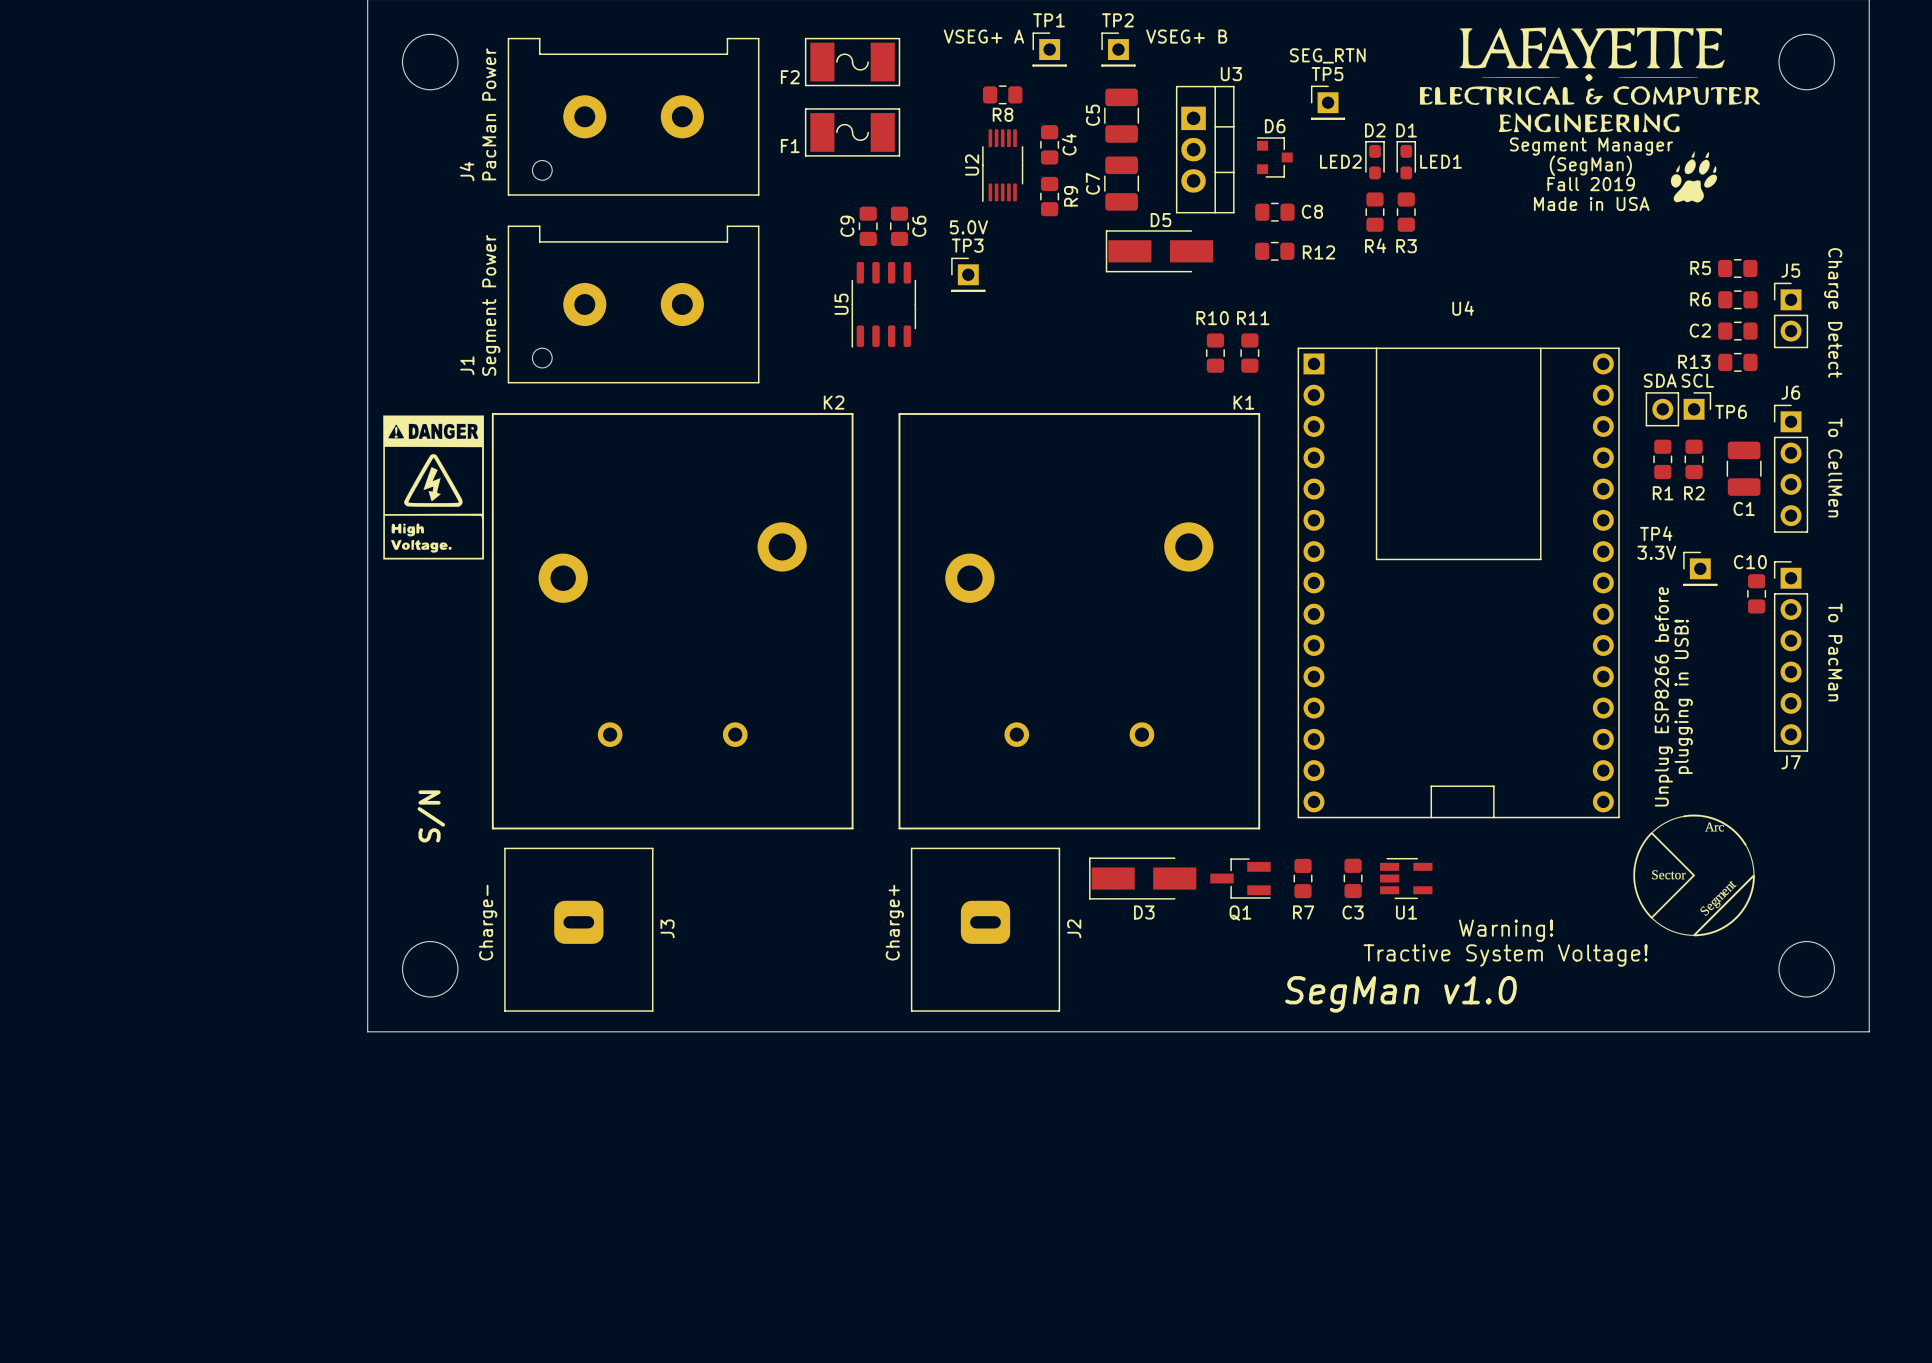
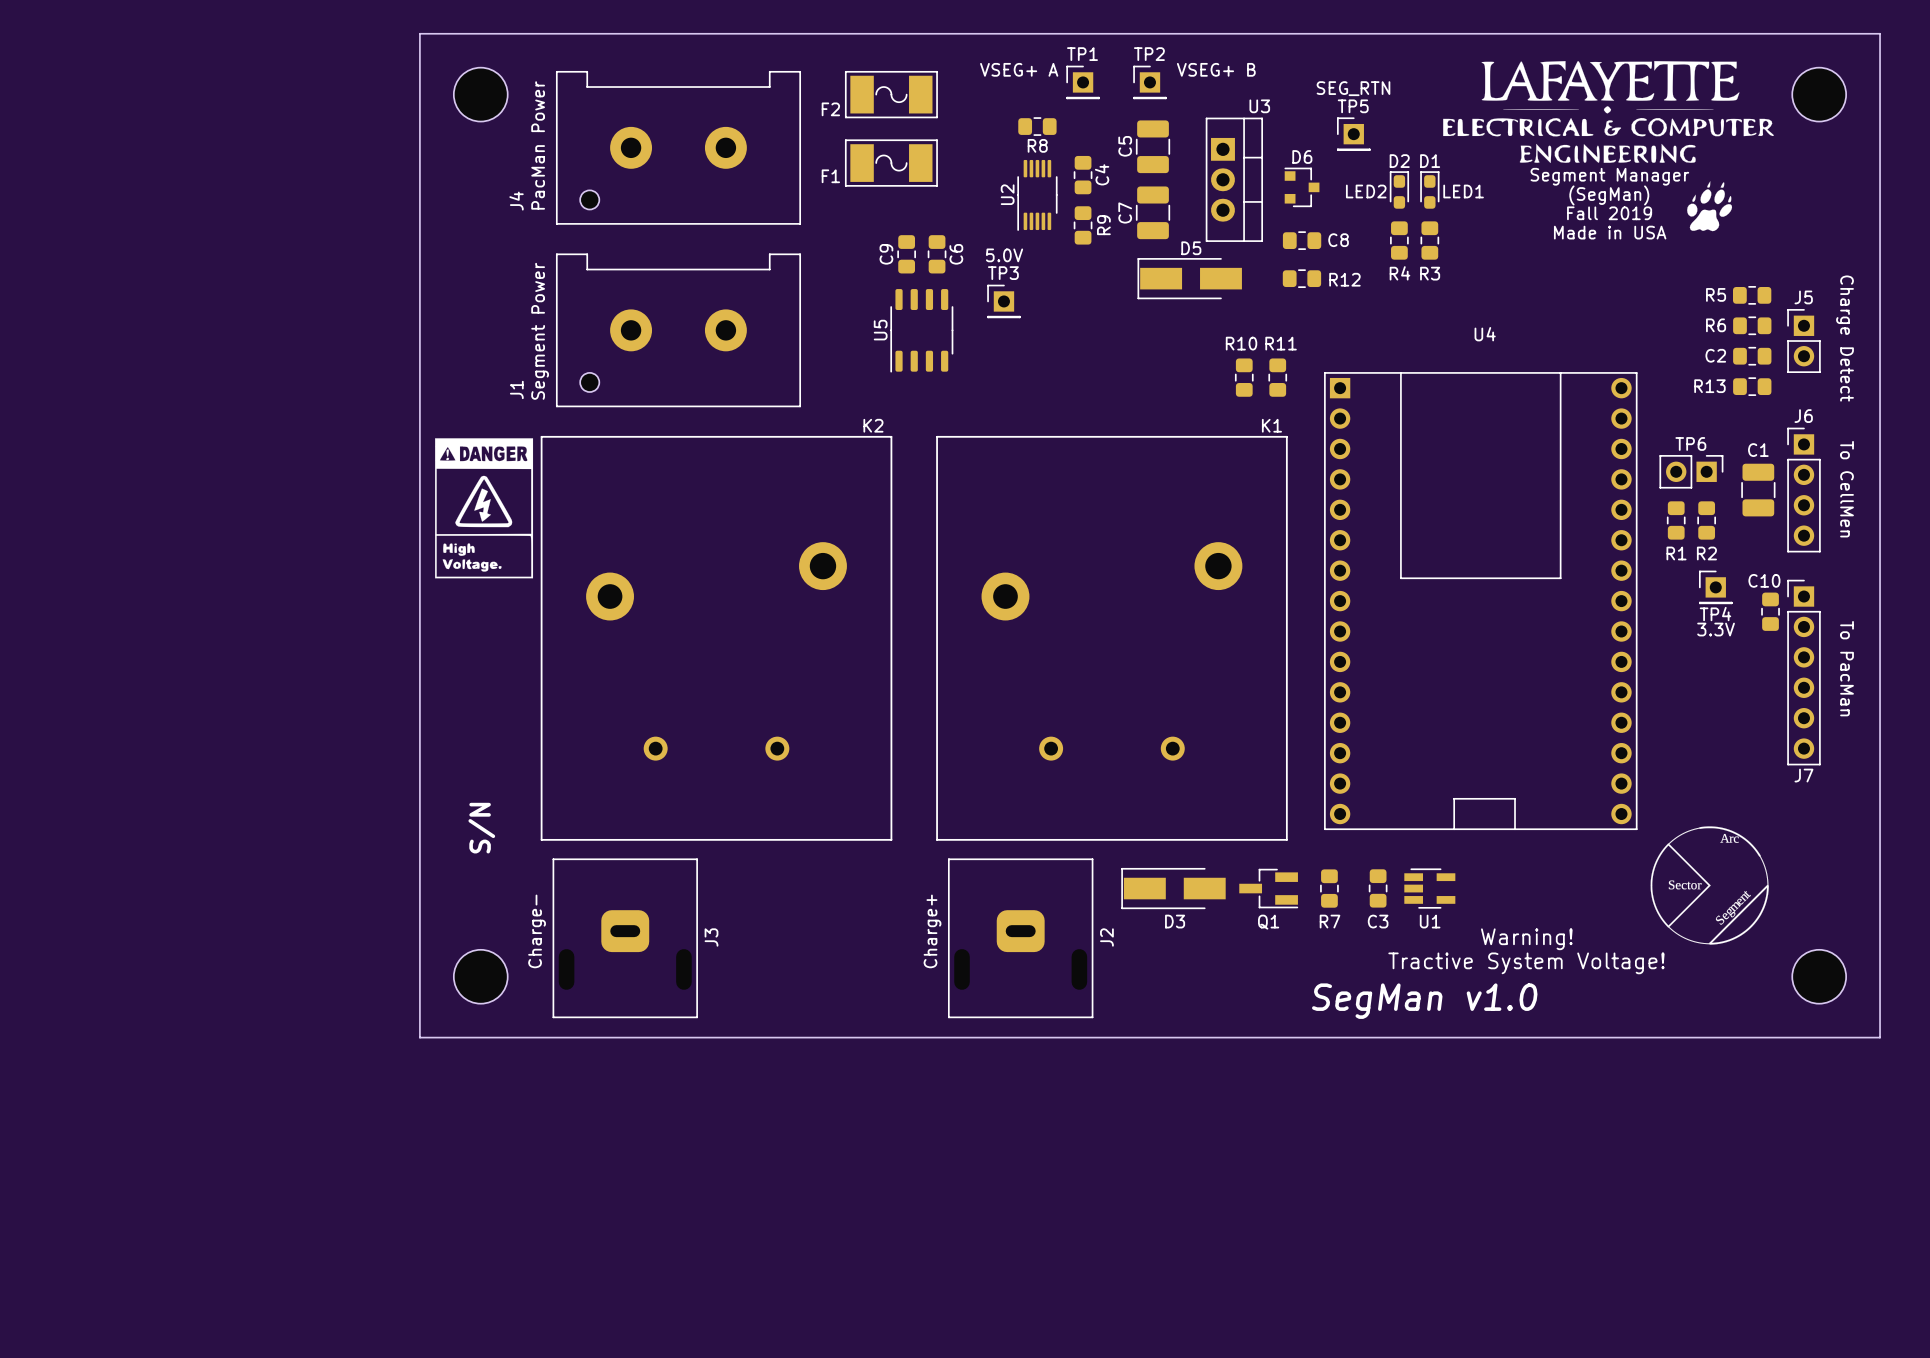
text: SDA (1660, 380) -> none
text: SCL (1697, 380) -> none
TP6 position: (1678, 409) -> (1691, 471)
TP6 name position: TP6 (1731, 411) -> TP6 (1690, 443)
R1 position: (1662, 459) -> (1676, 520)
R2 position: (1694, 459) -> (1706, 520)
C1 name position: C1 (1744, 508) -> C1 (1758, 450)
TP4 name position: TP4 (1656, 533) -> TP4 (1715, 614)
text position: 3.3V (1656, 552) -> 3.3V (1716, 629)
text: Unplug ESP8266 before (1663, 696) -> none
text: plugging in USB! (1683, 696) -> none

